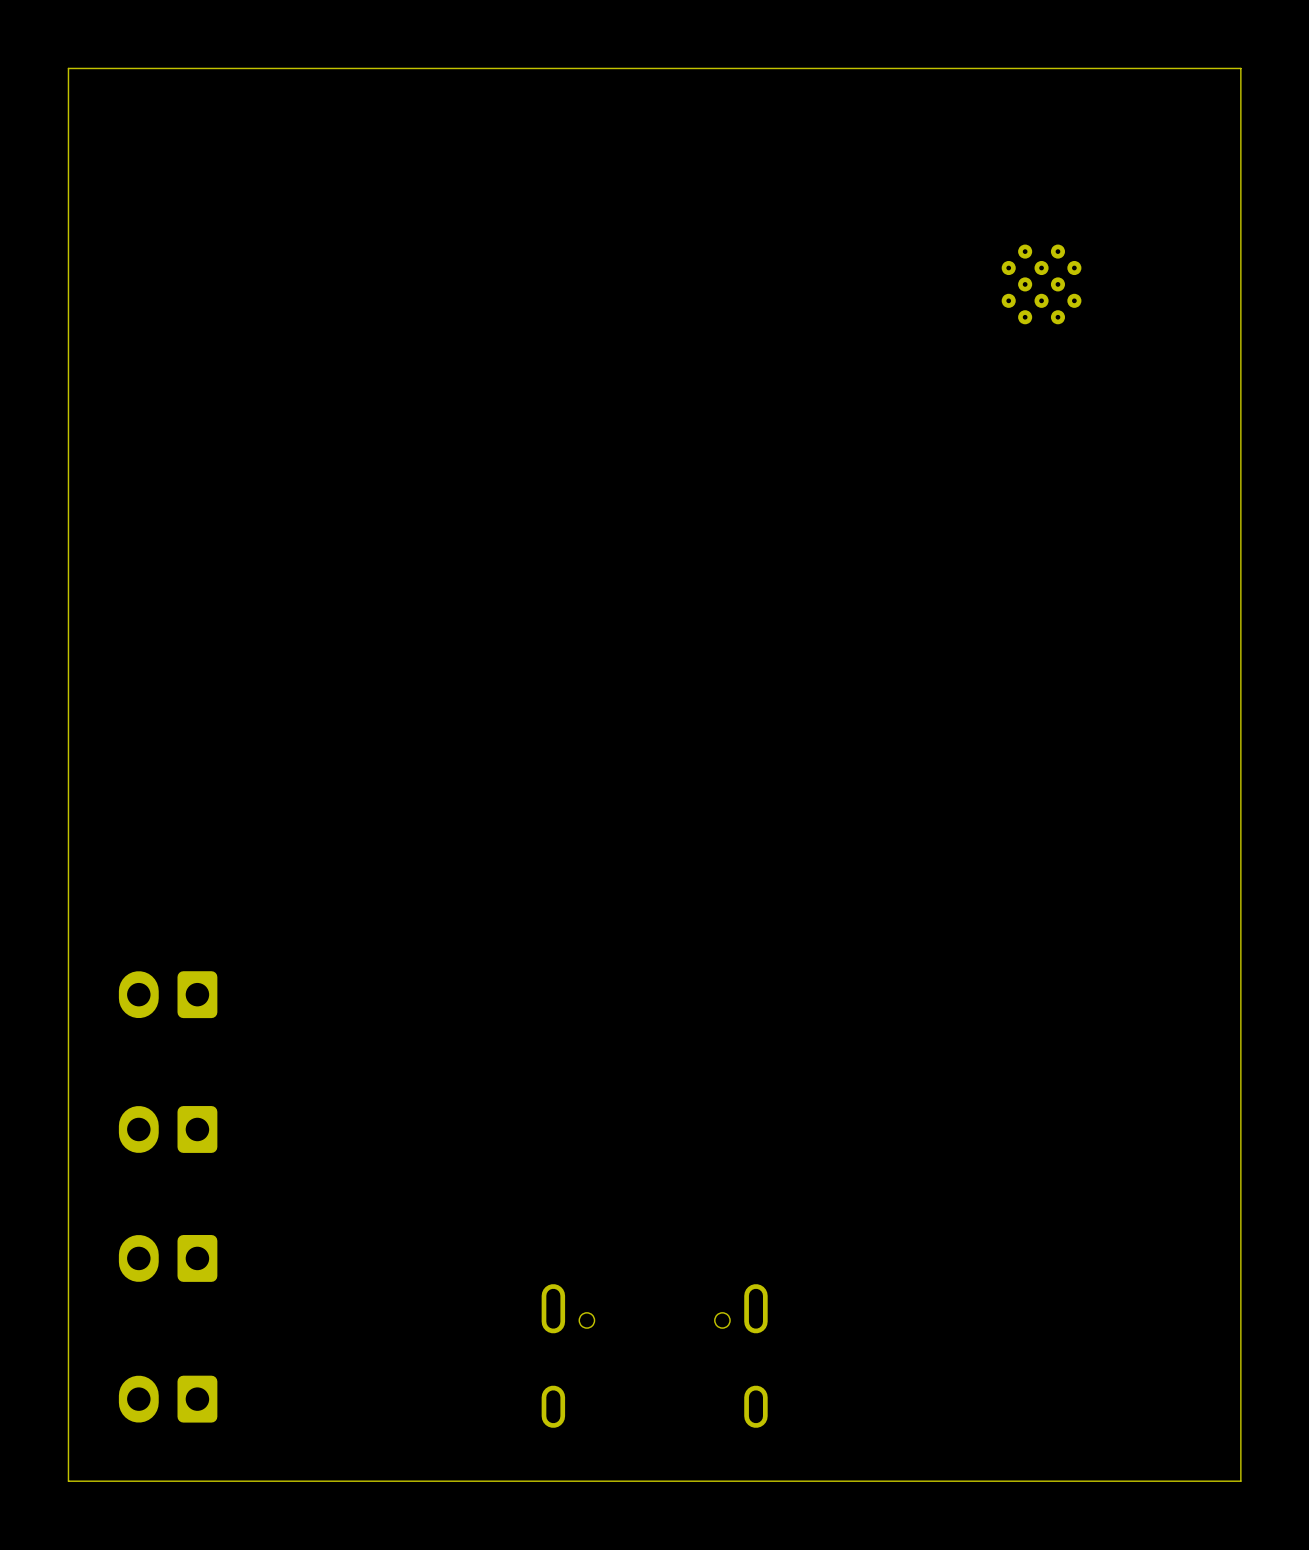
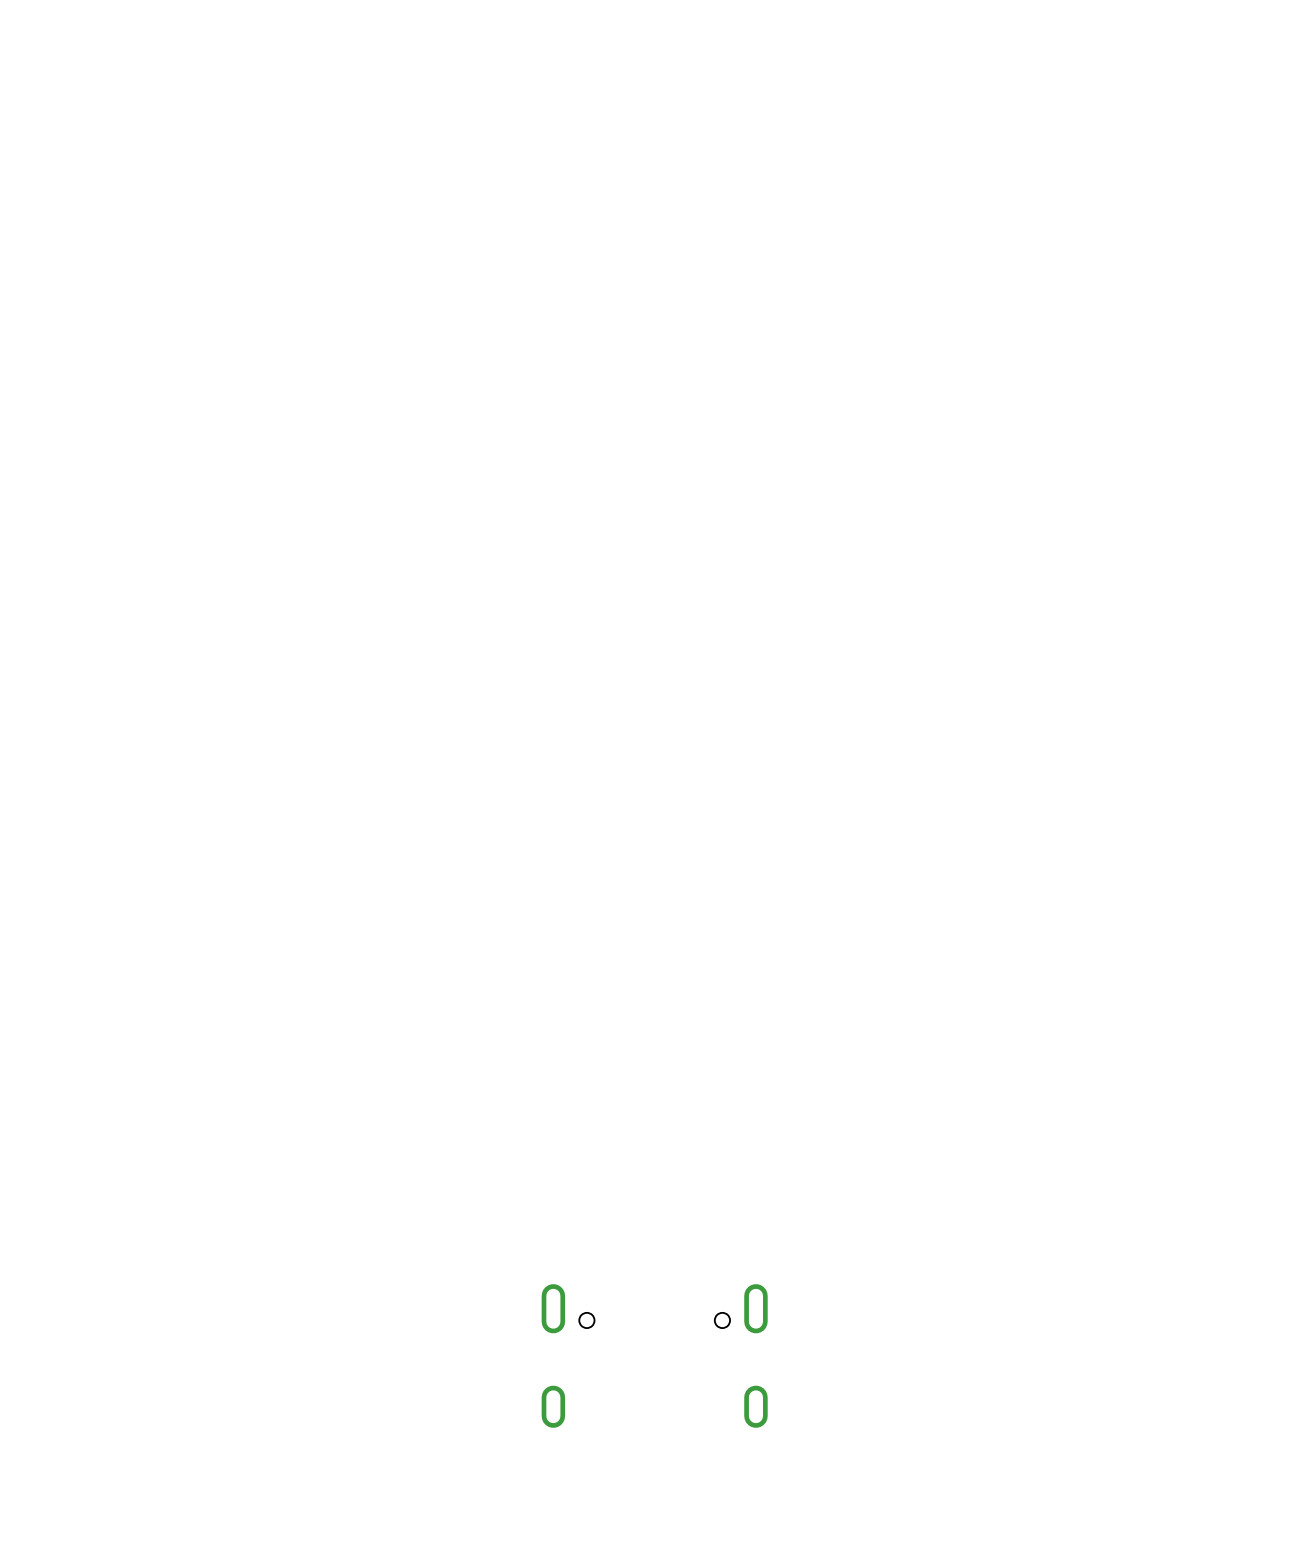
board edge: (1240, 68) (68, 68) (68, 1481) (1240, 1481) (1240, 68) -> none
part: (1041, 284) -> none
part: (168, 994) -> none
part: (168, 1129) -> none
part: (168, 1258) -> none
part: (168, 1399) -> none

